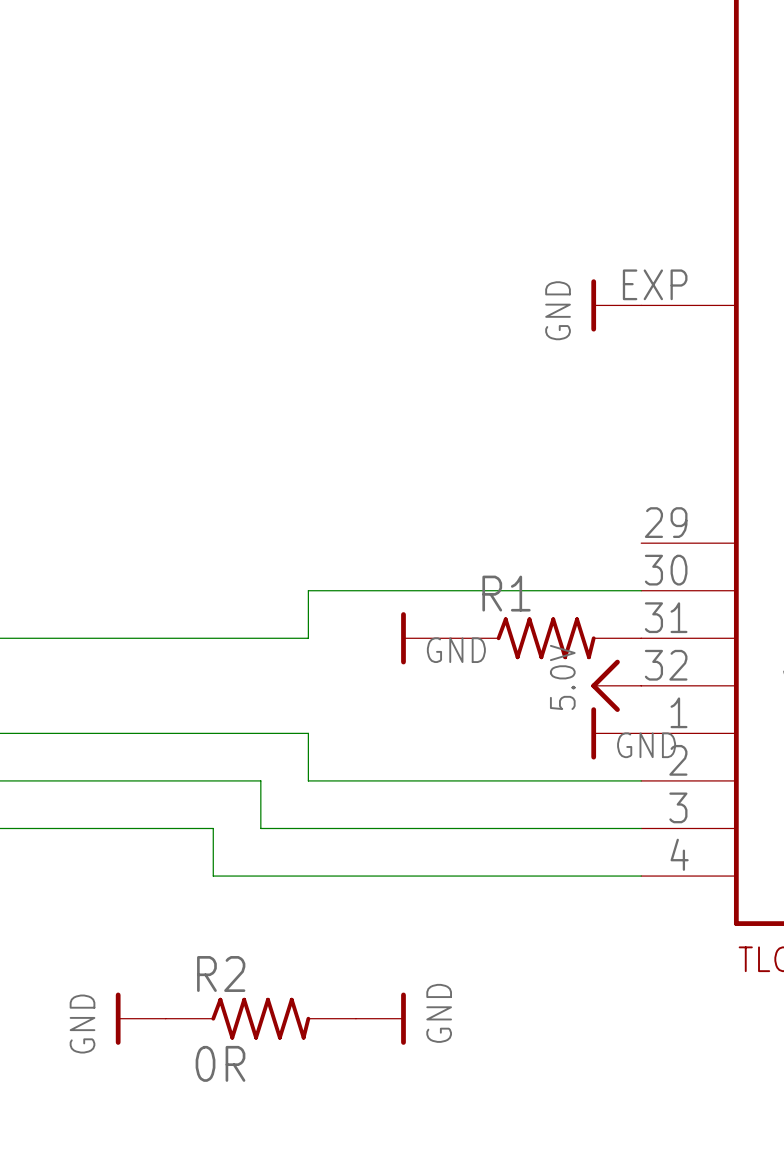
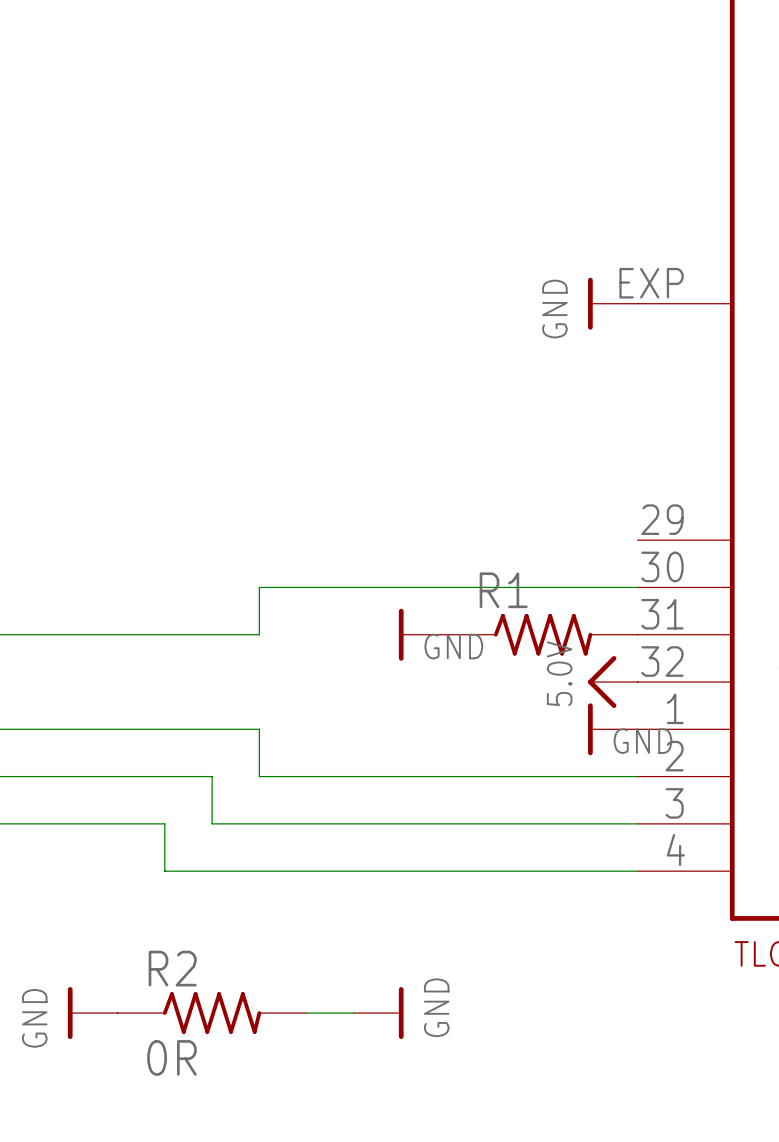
wire: (308, 590) (308, 638) (260, 638) -> (306, 587) (259, 587) (259, 634)
wire: (260, 733) (308, 733) (308, 780) -> (259, 729) (259, 776) (306, 776)
wire: (213, 780) (260, 780) (260, 828) -> (212, 776) (212, 823) (259, 823)
wire: (165, 828) (213, 828) (213, 876) -> (164, 823) (164, 871) (212, 871)
power symbol position: GND (140, 1018) -> GND (92, 1013)
R2 position: (260, 1018) -> (212, 1013)

